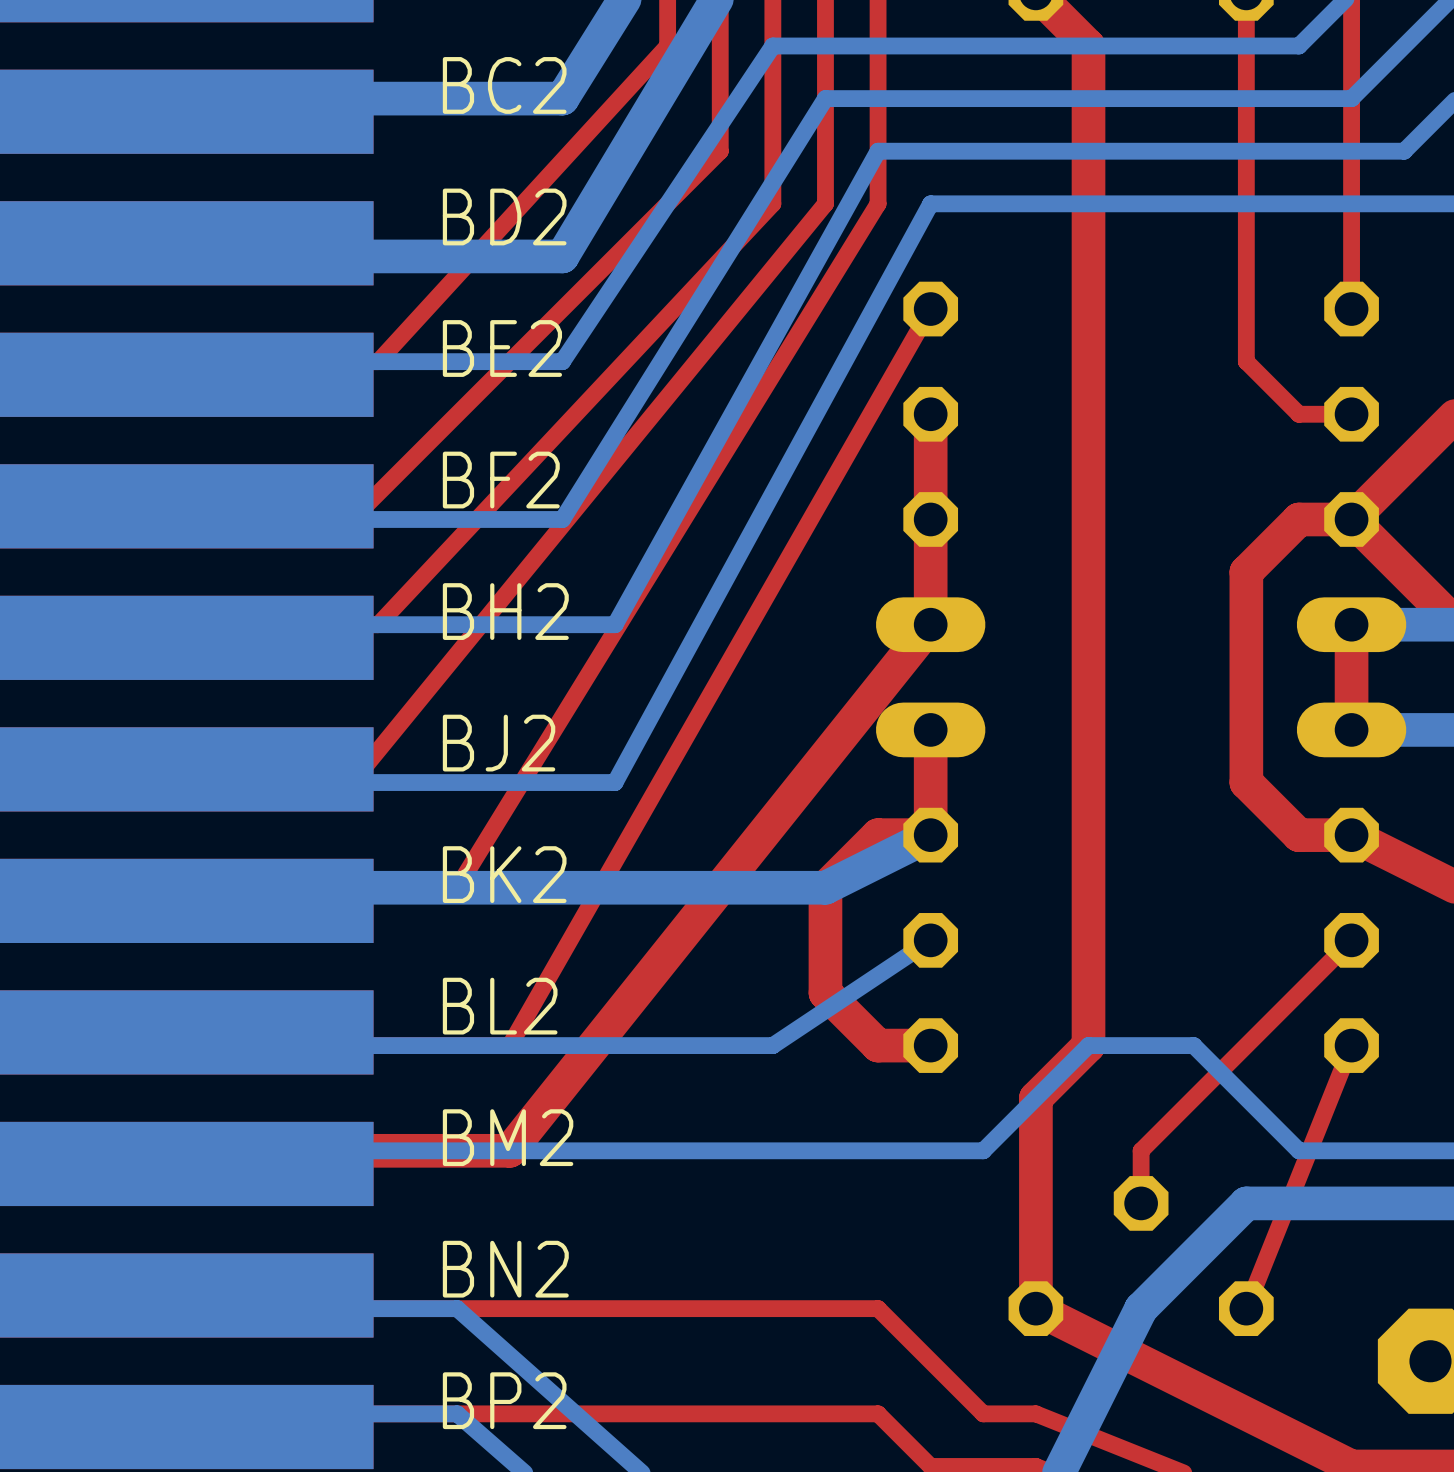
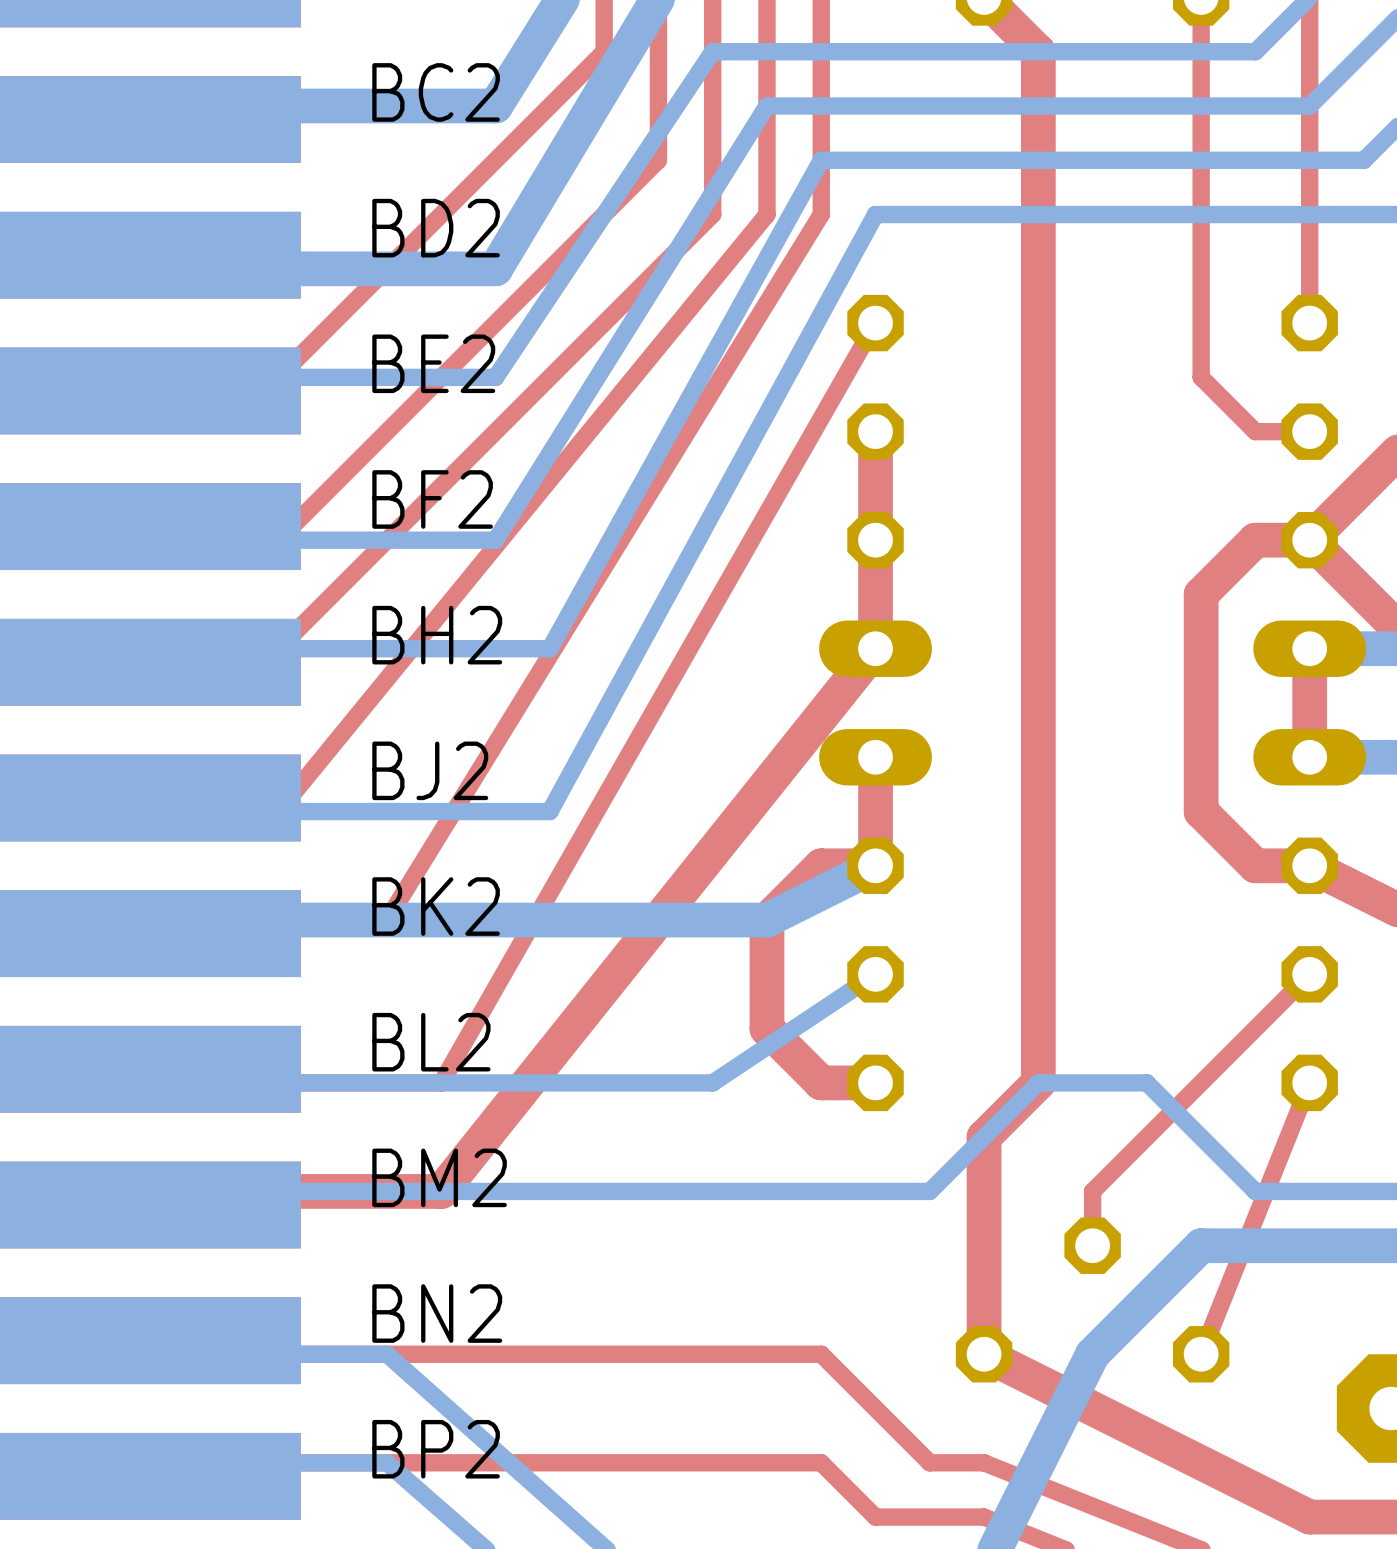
top track: (667, 45) (378, 361) (351, 361) -> (604, 51) (278, 377)
top track: (772, 203) (378, 624) (351, 624) -> (712, 214) (278, 648)

